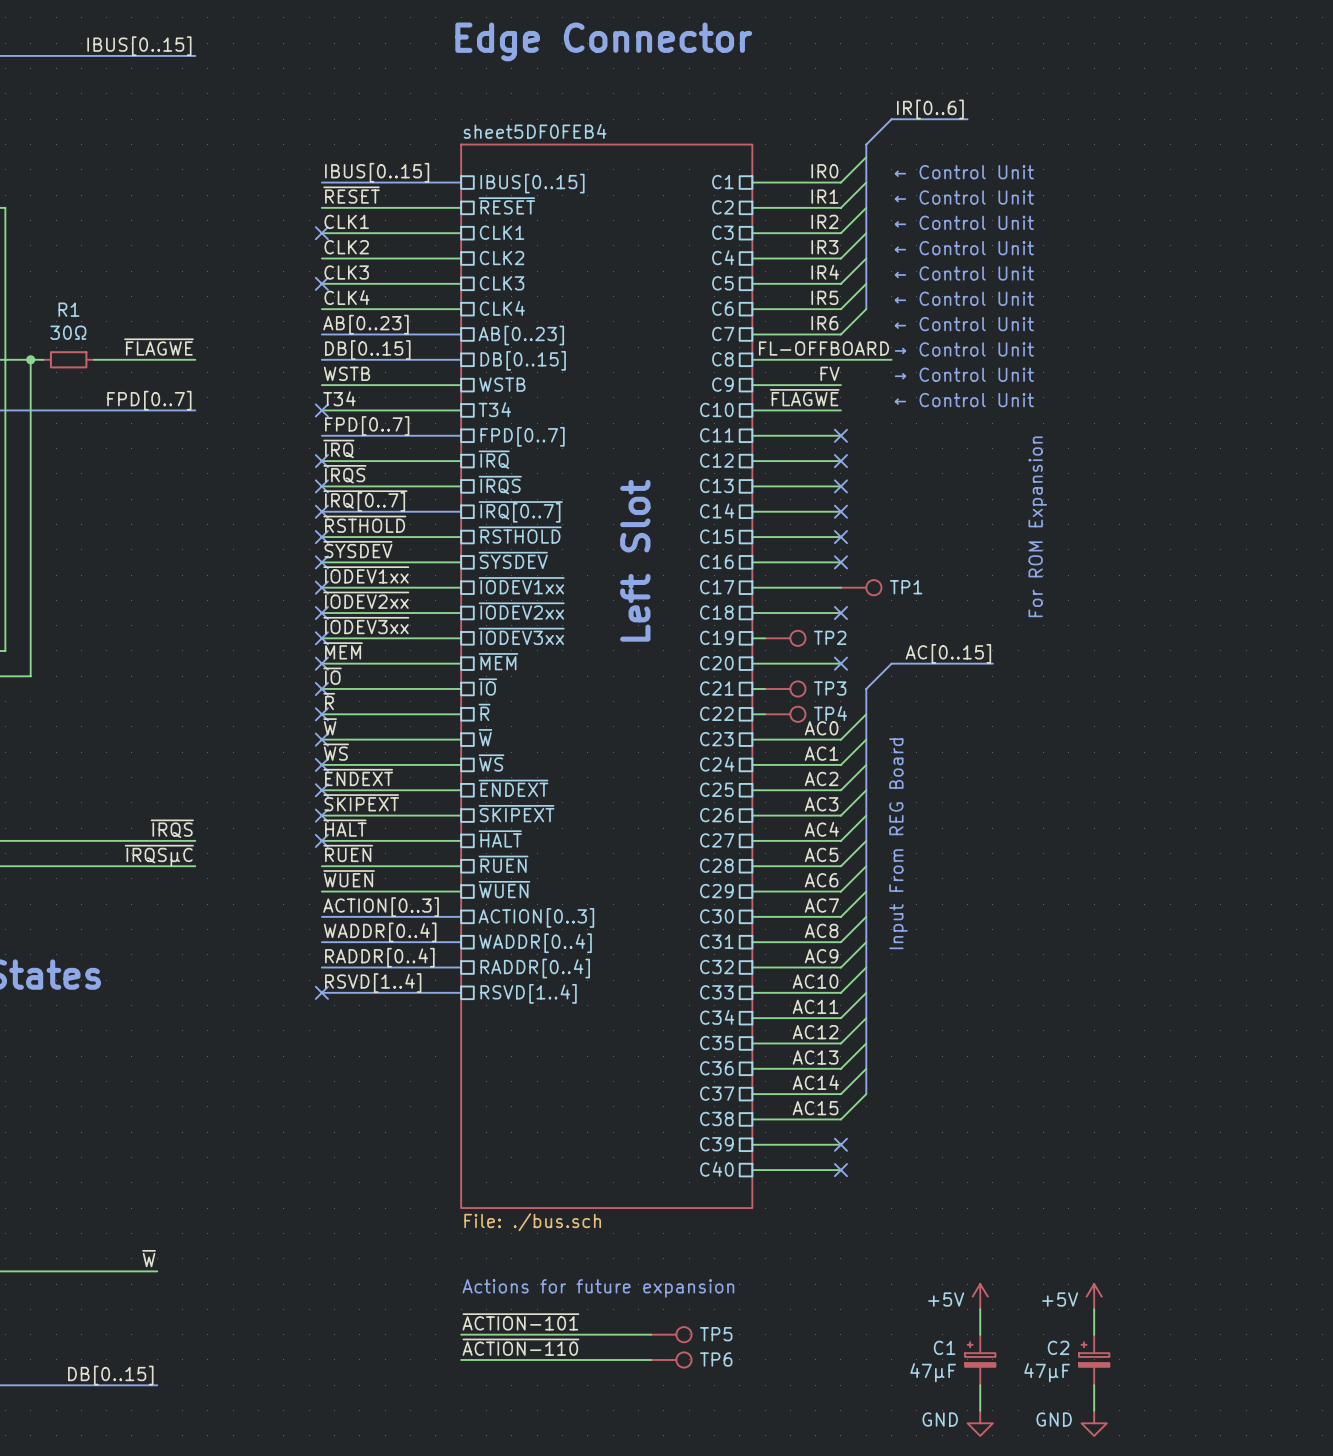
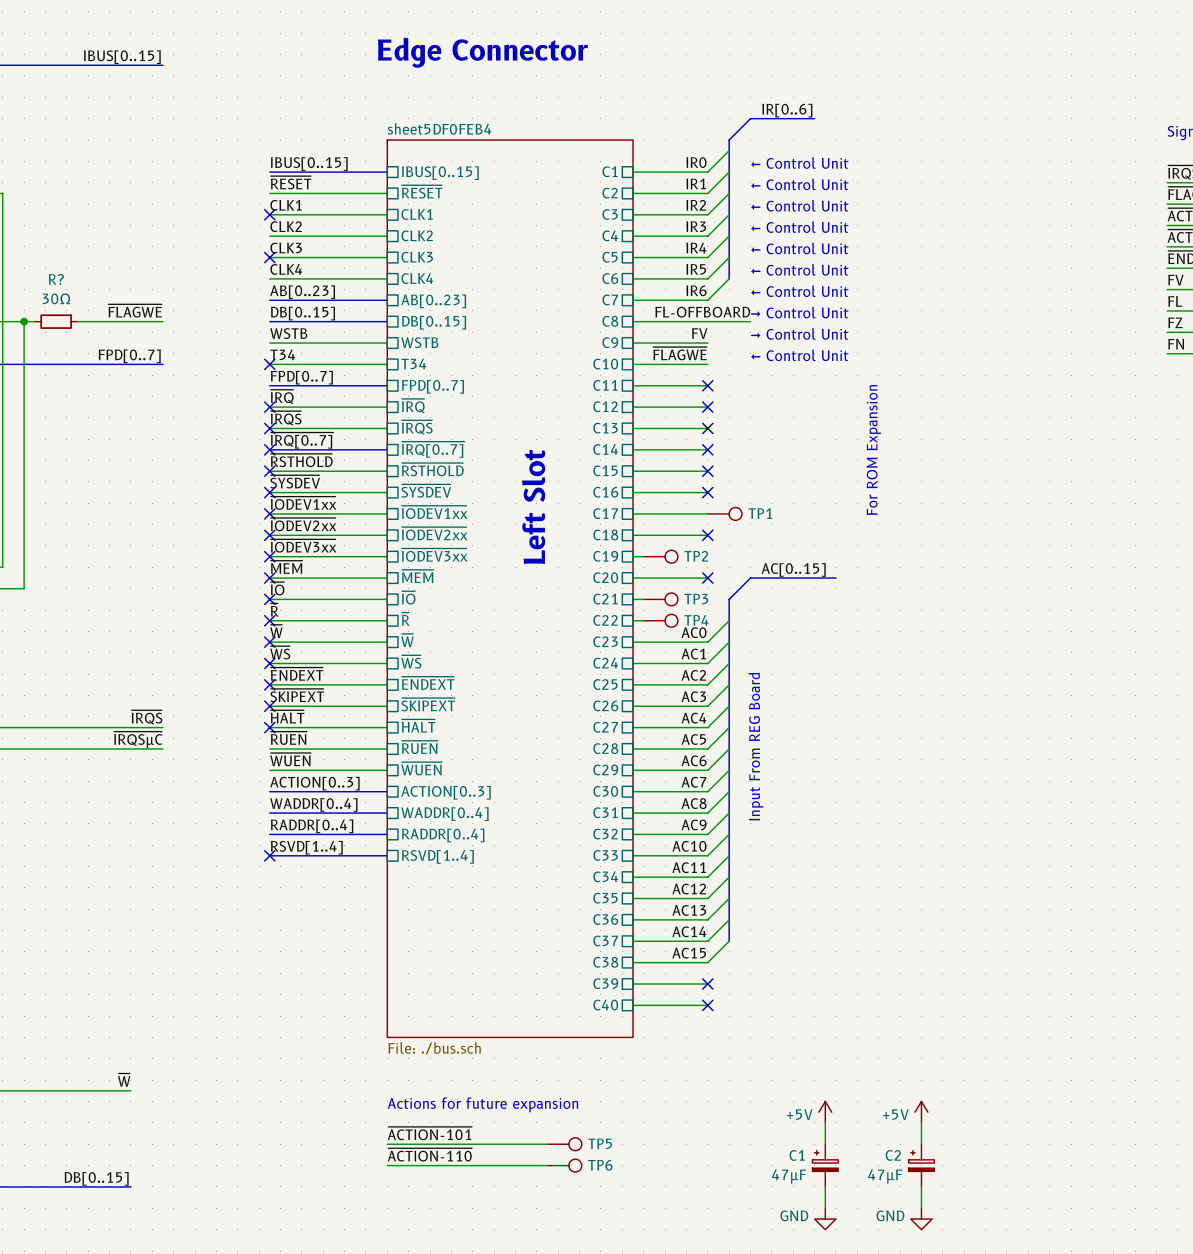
R1 name: R1 (68, 309) -> R? (56, 279)

